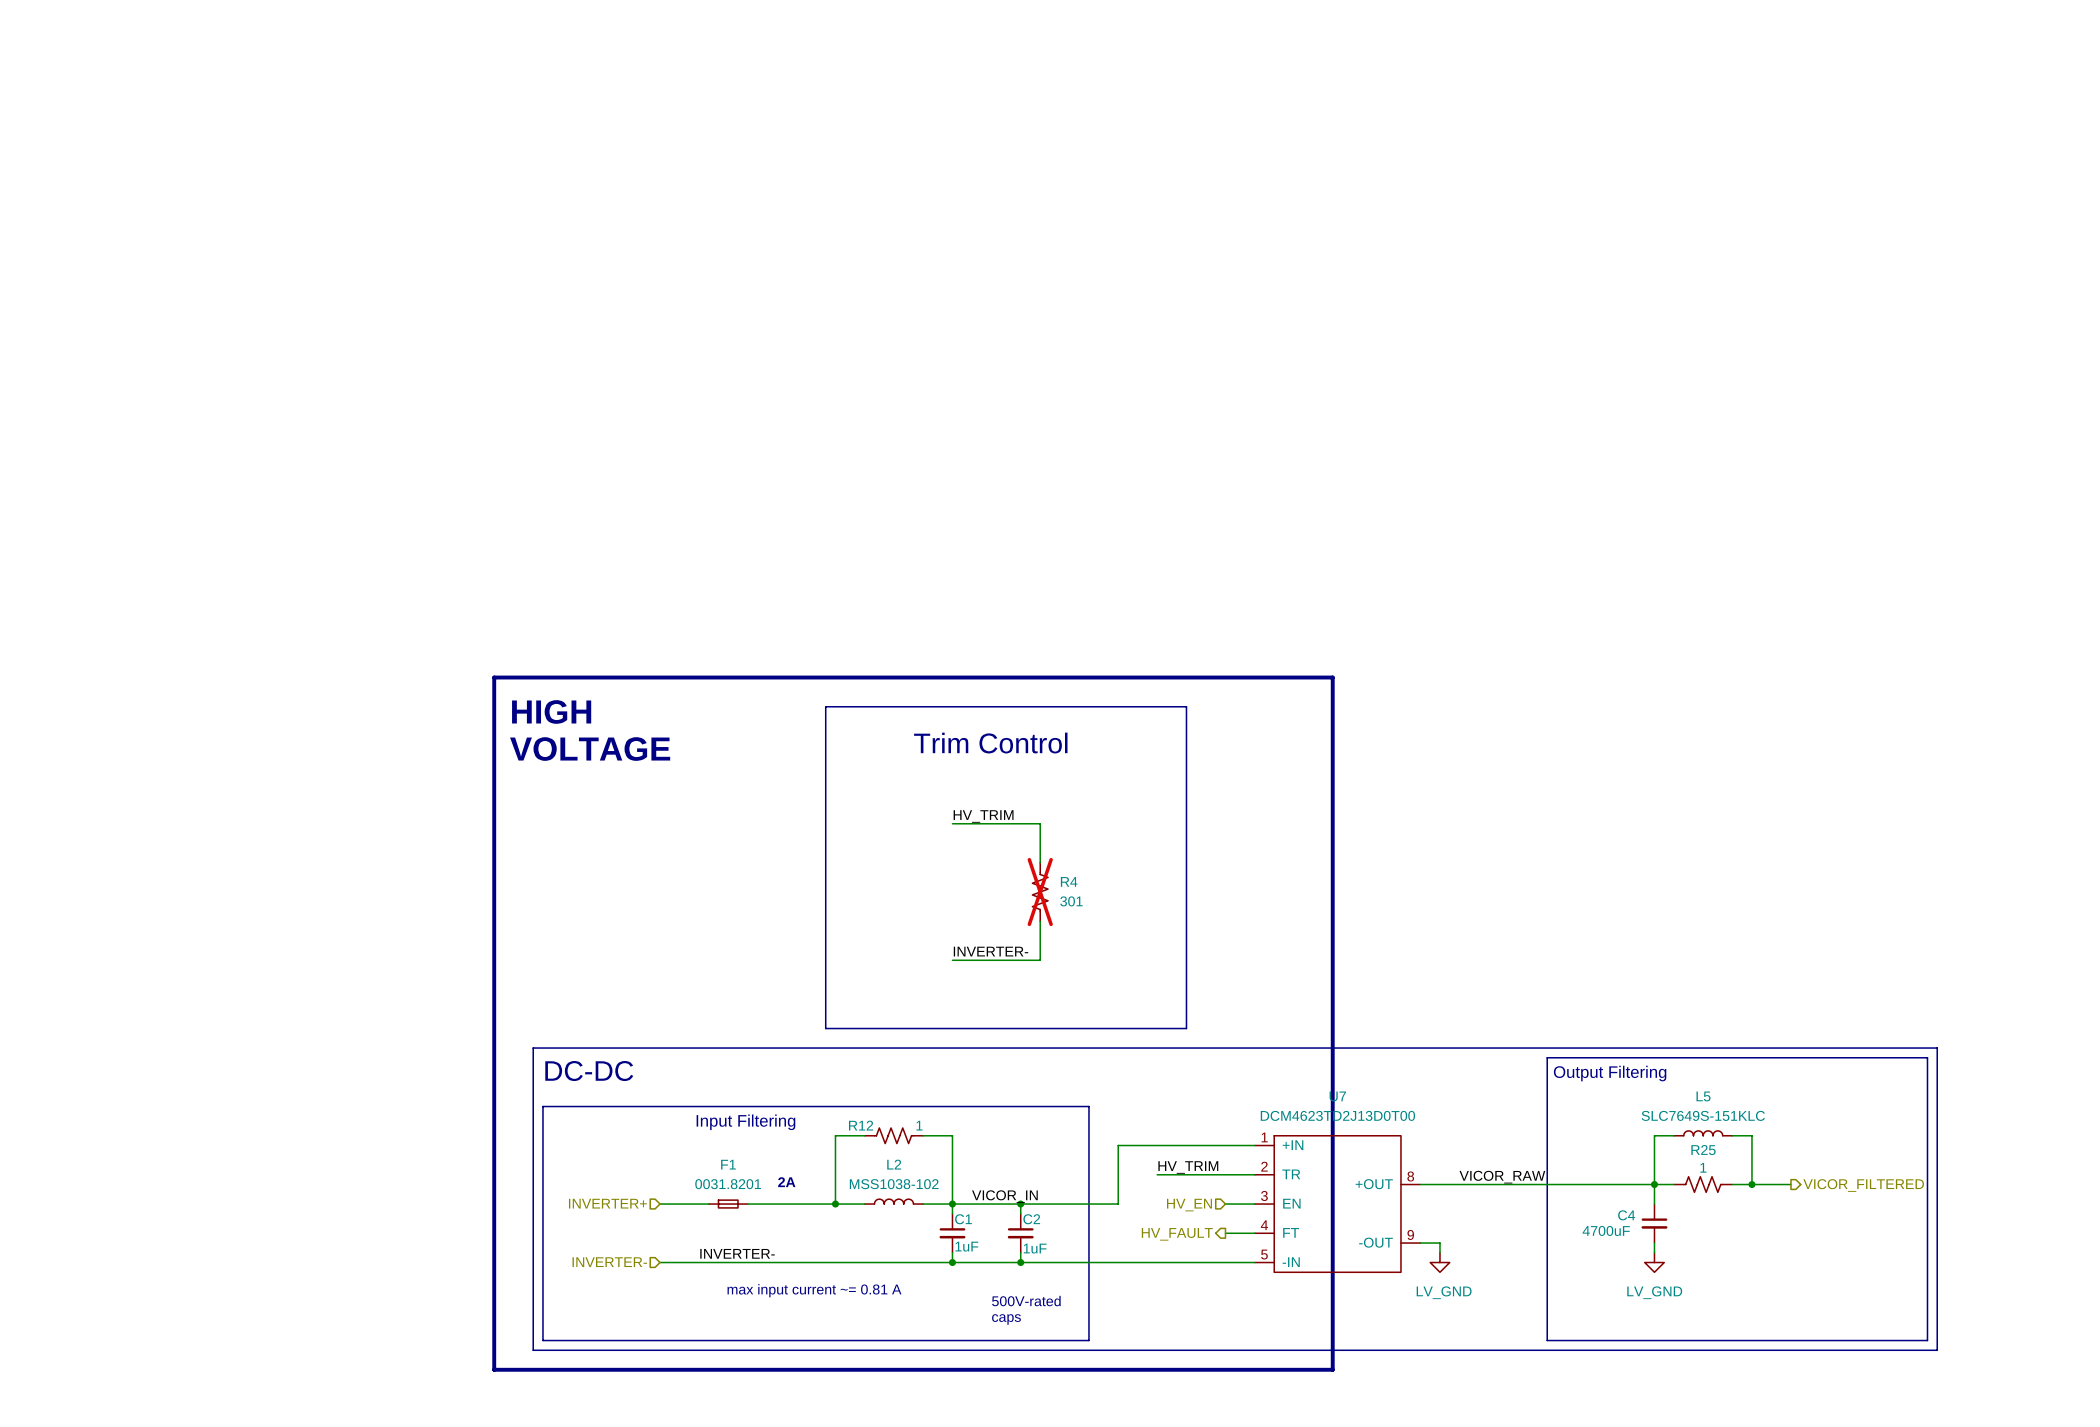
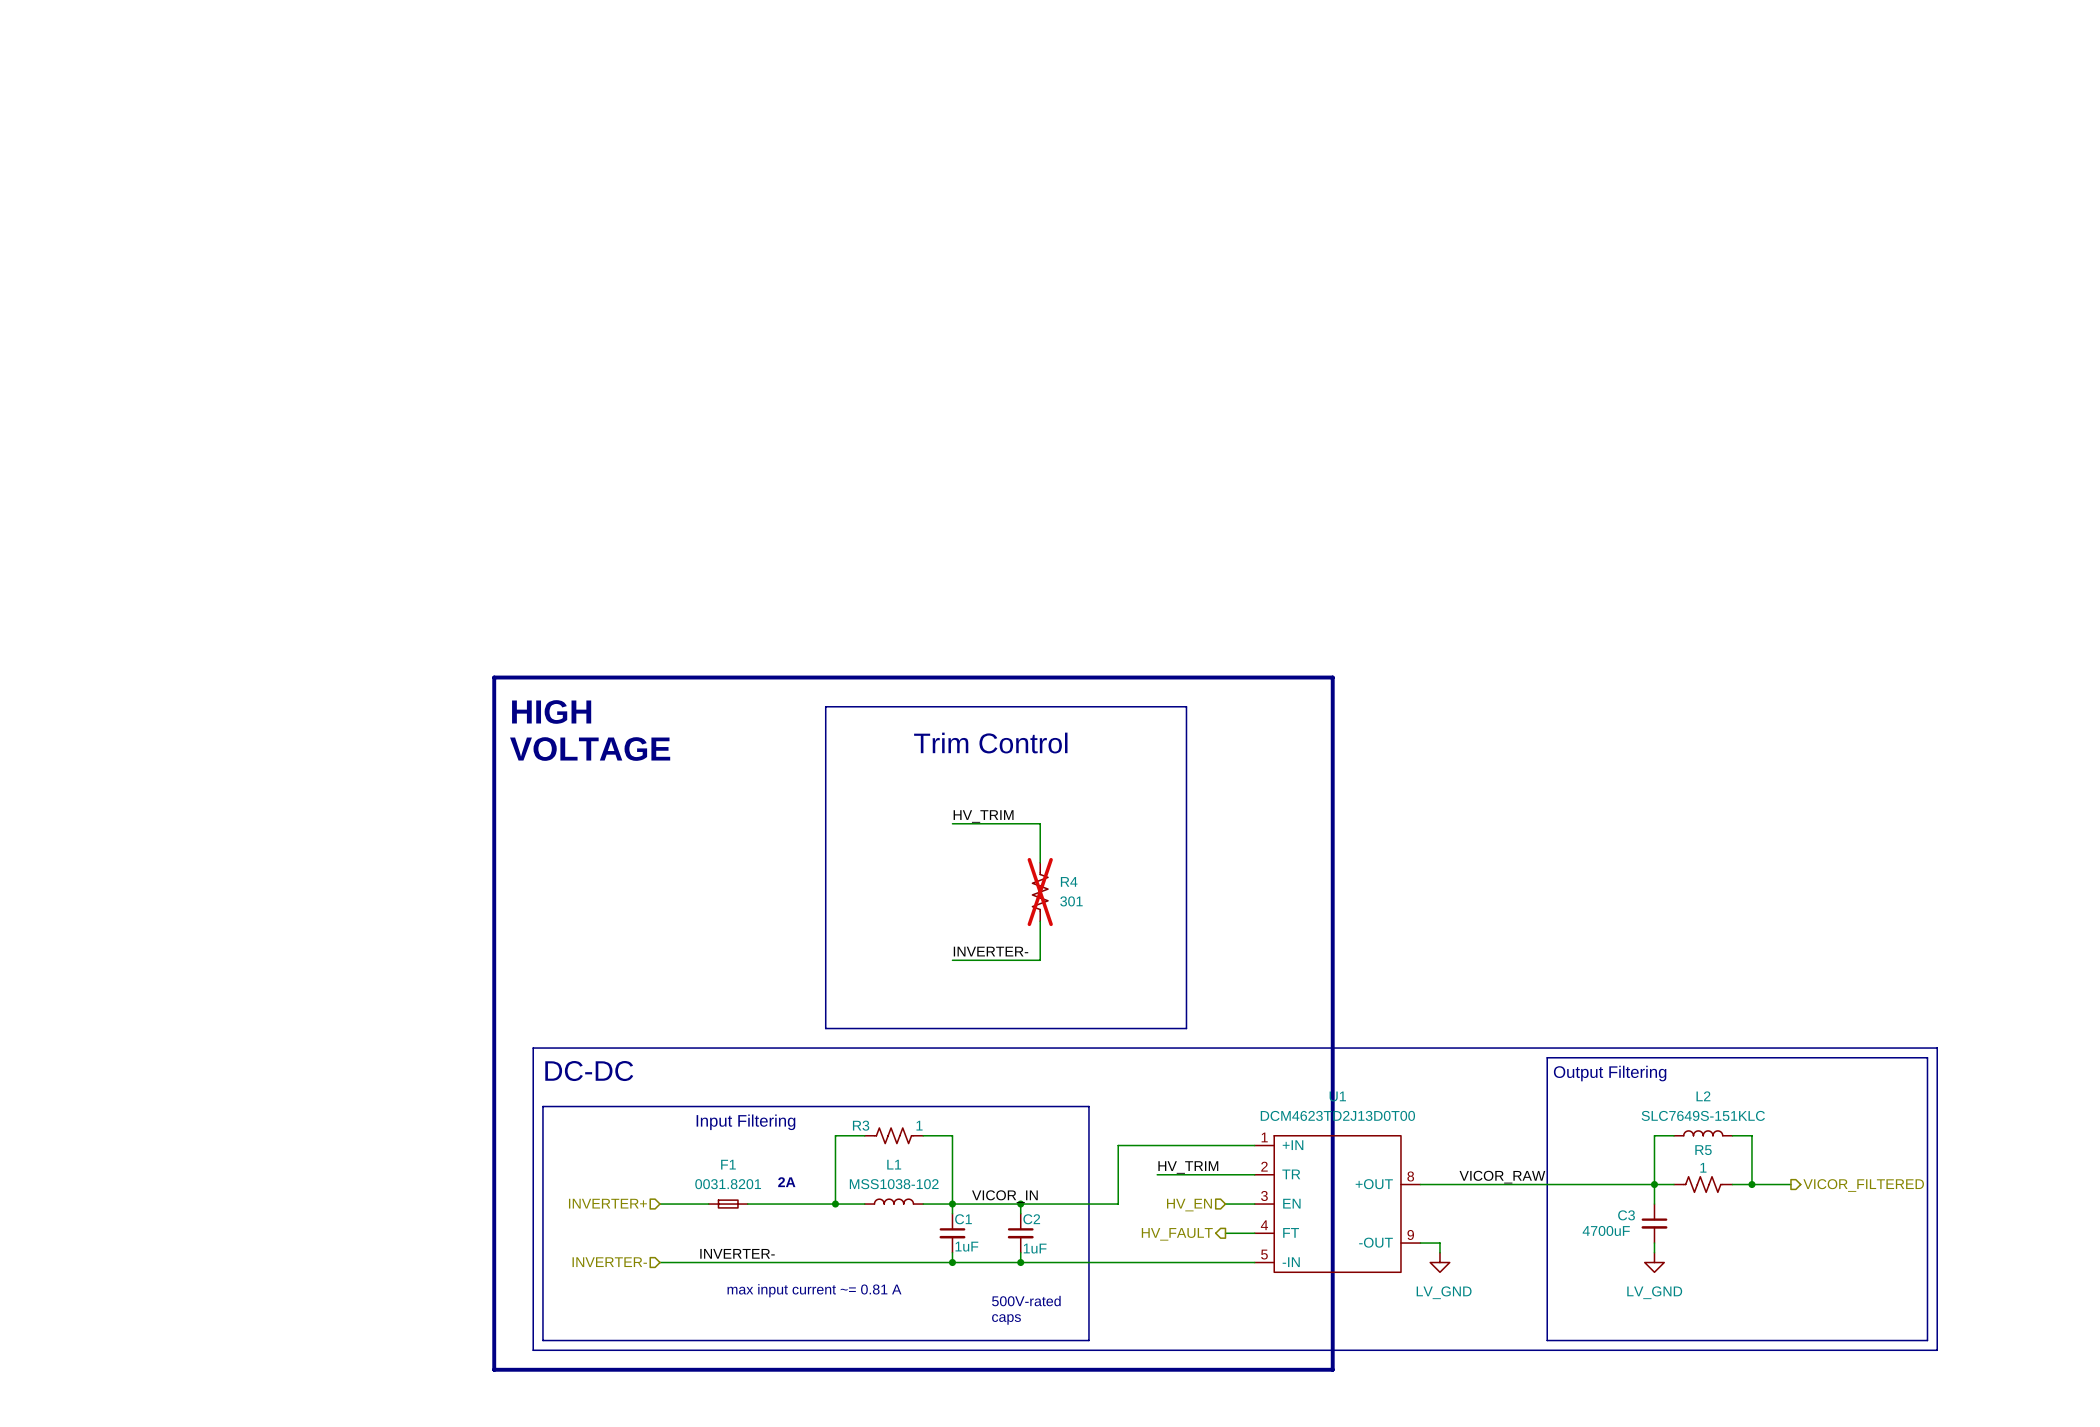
U7 name: U7 (1337, 1096) -> U1 (1337, 1096)
L5 name: L5 (1703, 1096) -> L2 (1703, 1096)
R12 name: R12 (861, 1125) -> R3 (861, 1125)
R25 name: R25 (1703, 1150) -> R5 (1703, 1150)
L2 name: L2 (894, 1164) -> L1 (894, 1164)
C4 name: C4 (1626, 1215) -> C3 (1626, 1215)

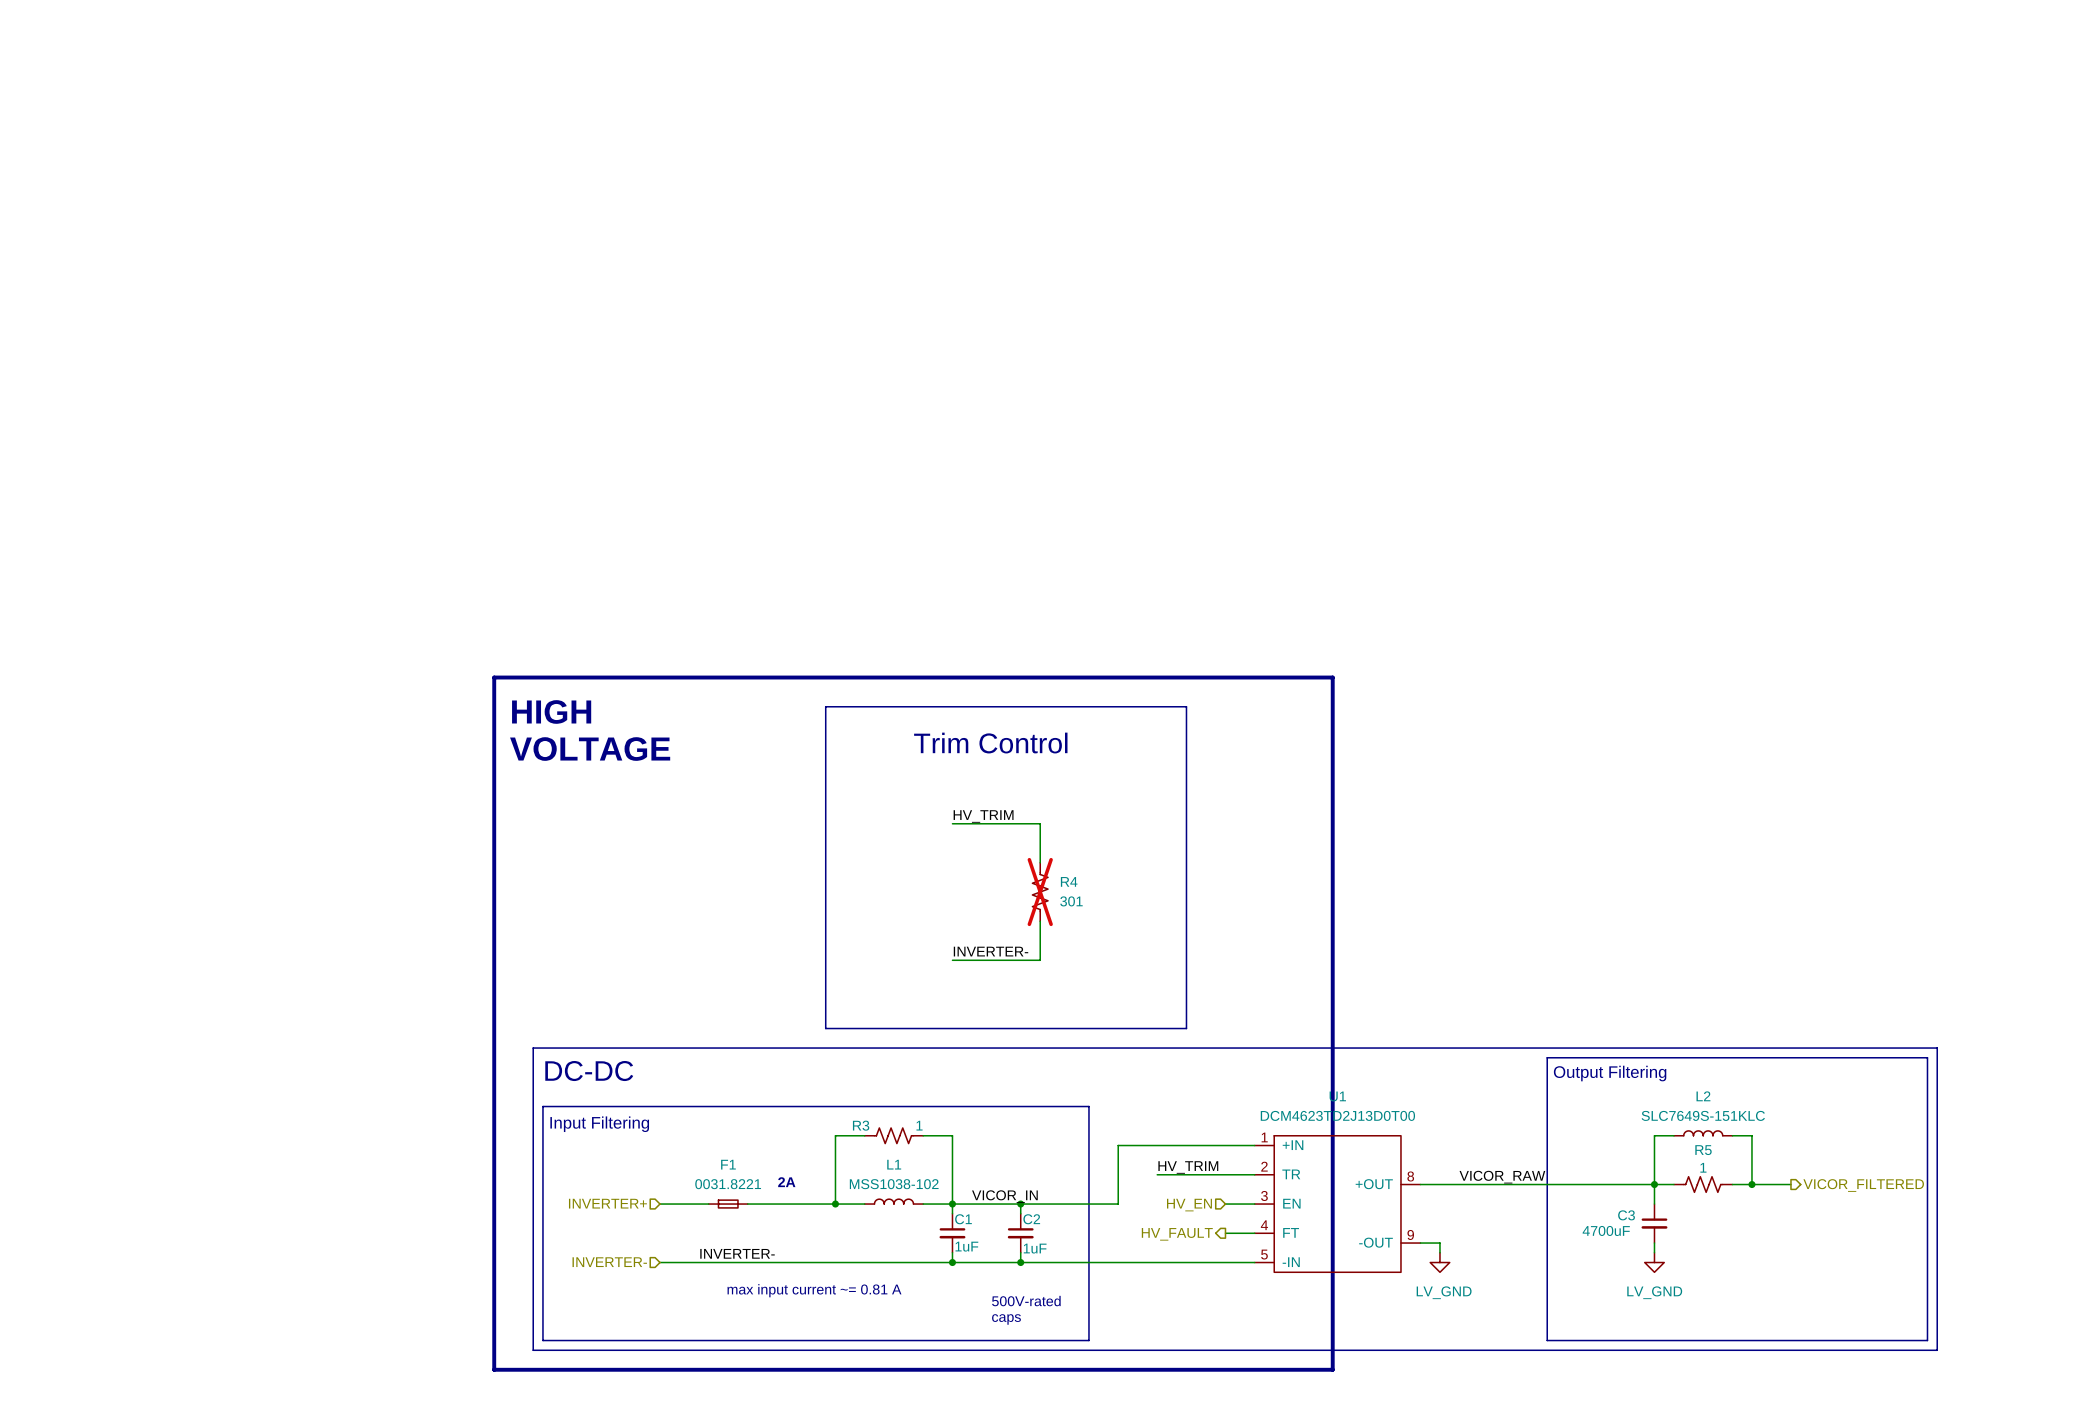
text position: Input Filtering (745, 1122) -> Input Filtering (599, 1124)
F1 value: 0031.8201 (728, 1184) -> 0031.8221 (728, 1184)

